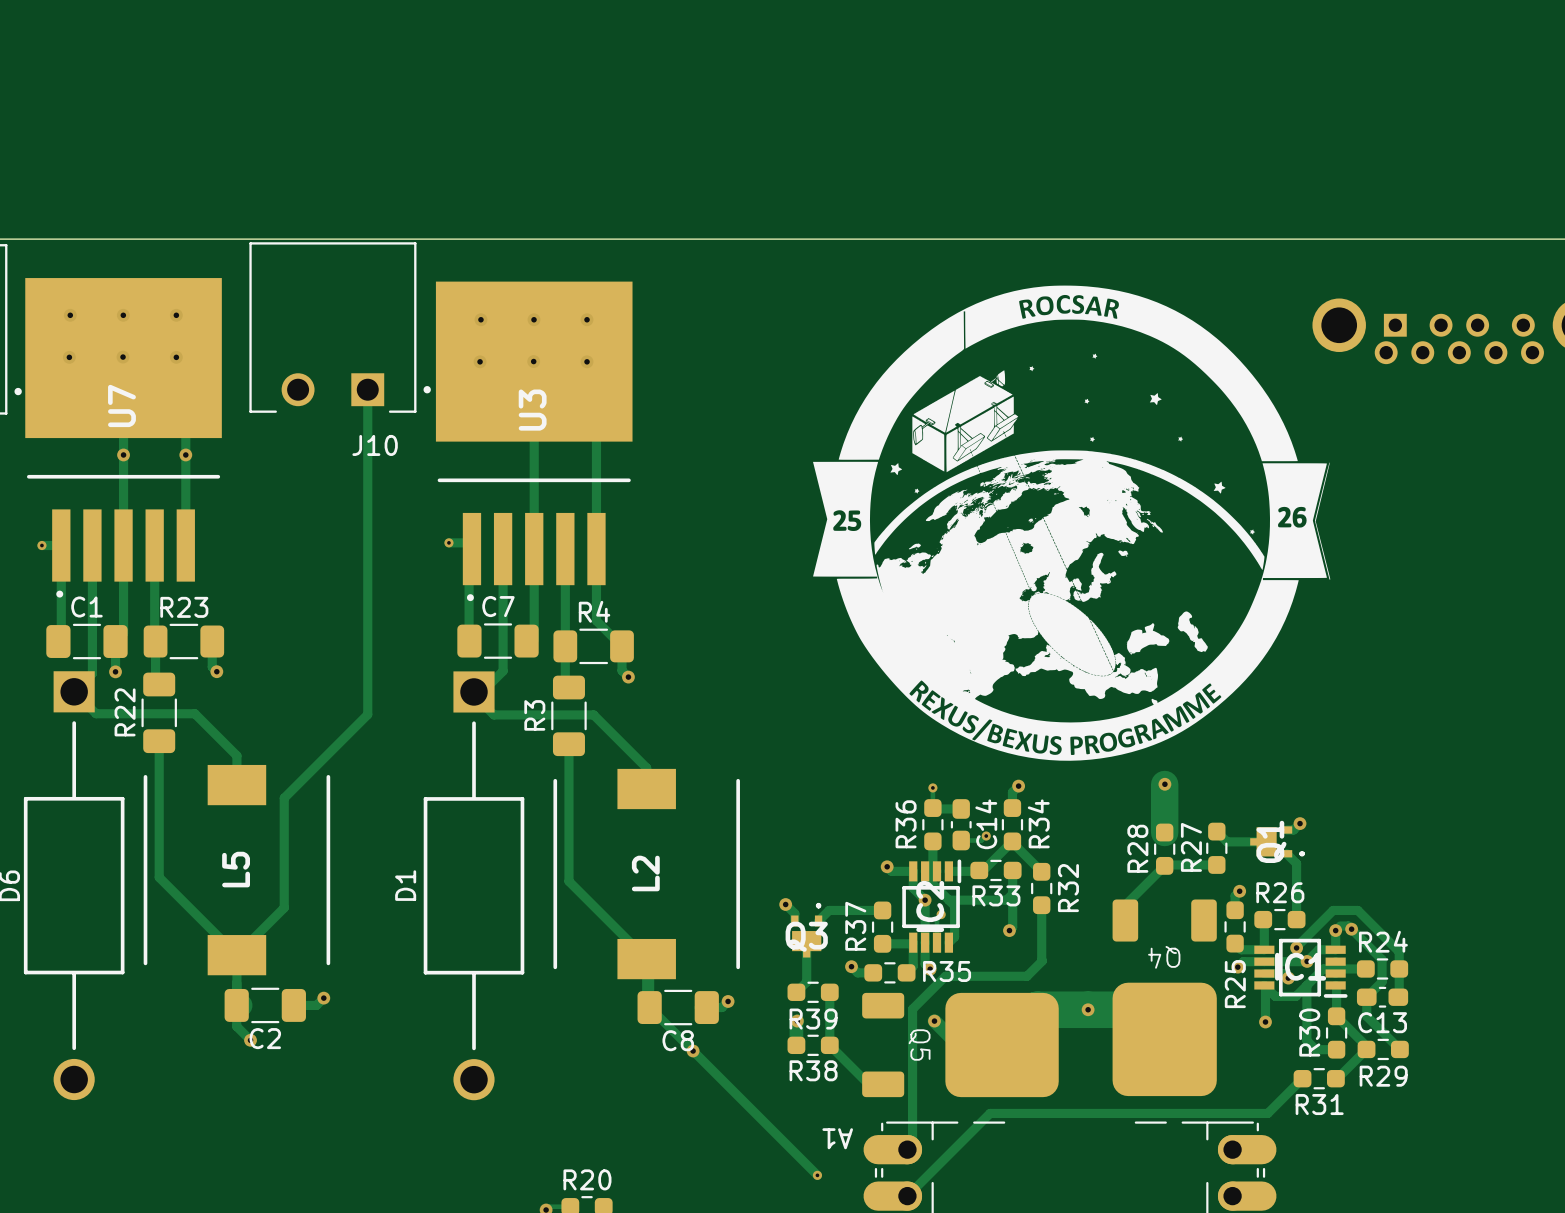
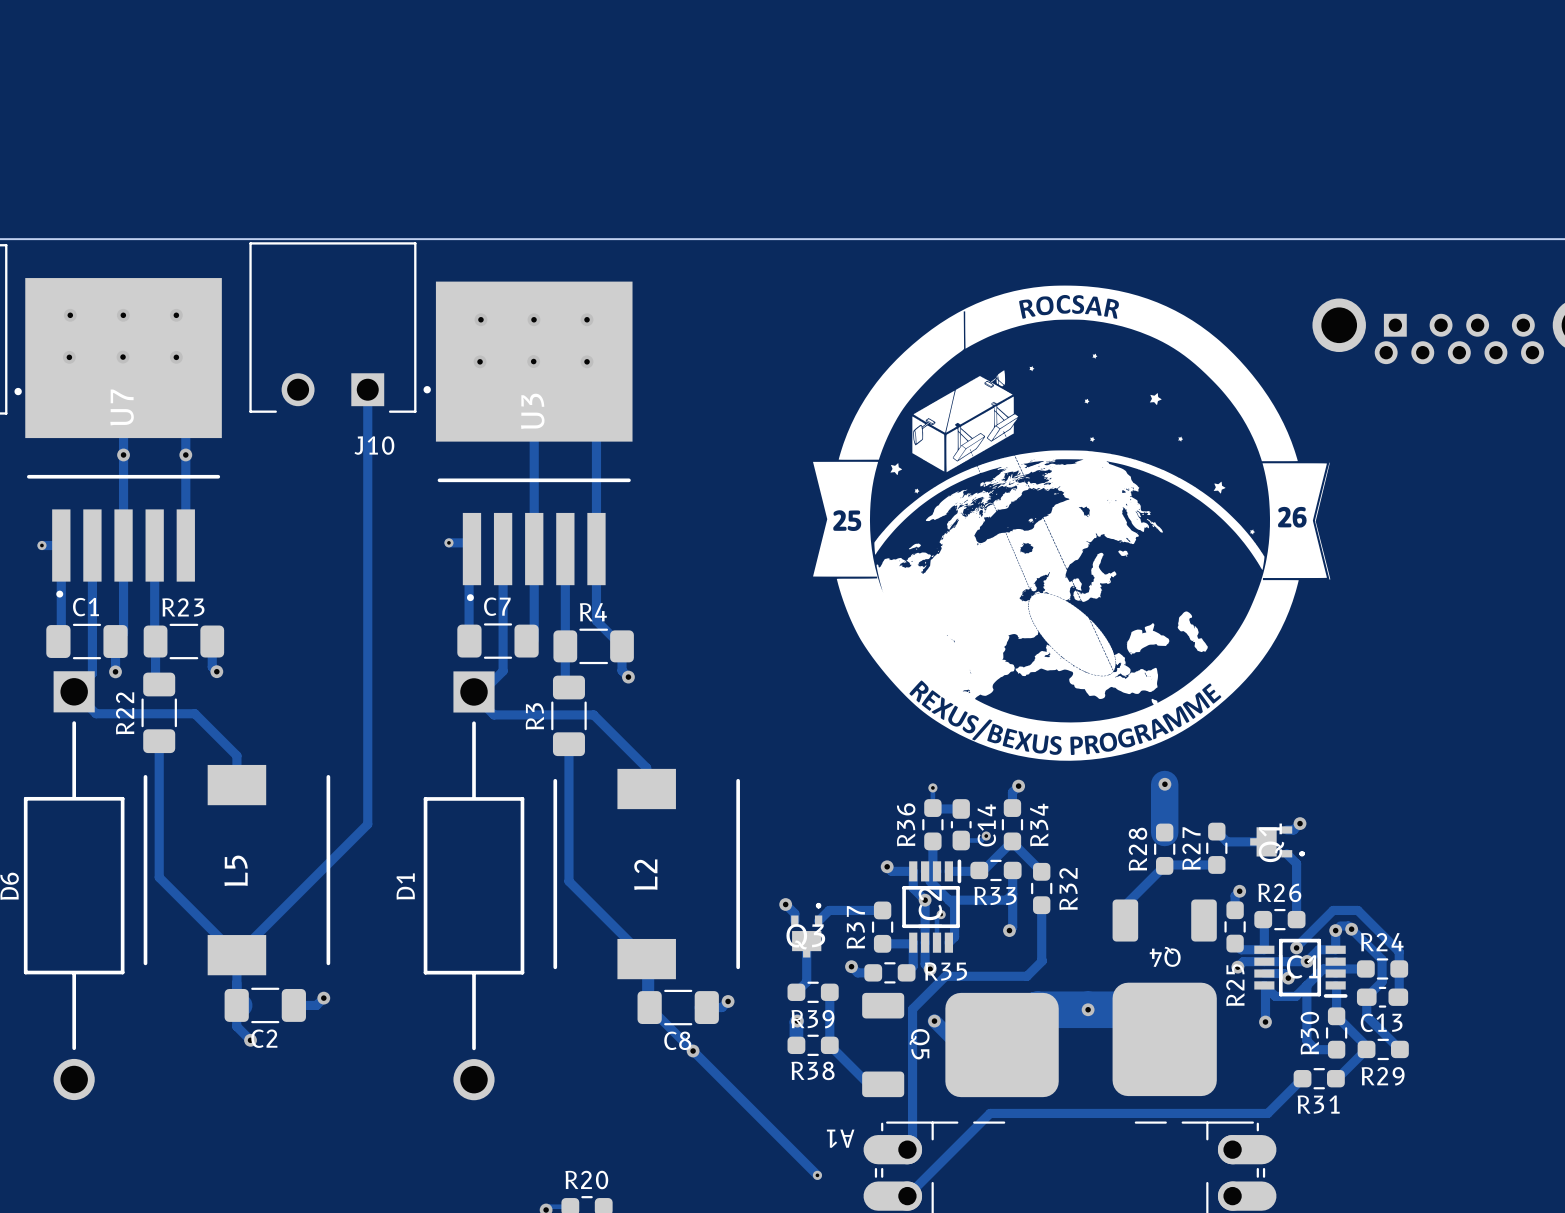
track: (367, 714) (284, 798) (284, 907) -> (367, 714) (367, 824) (284, 907)

